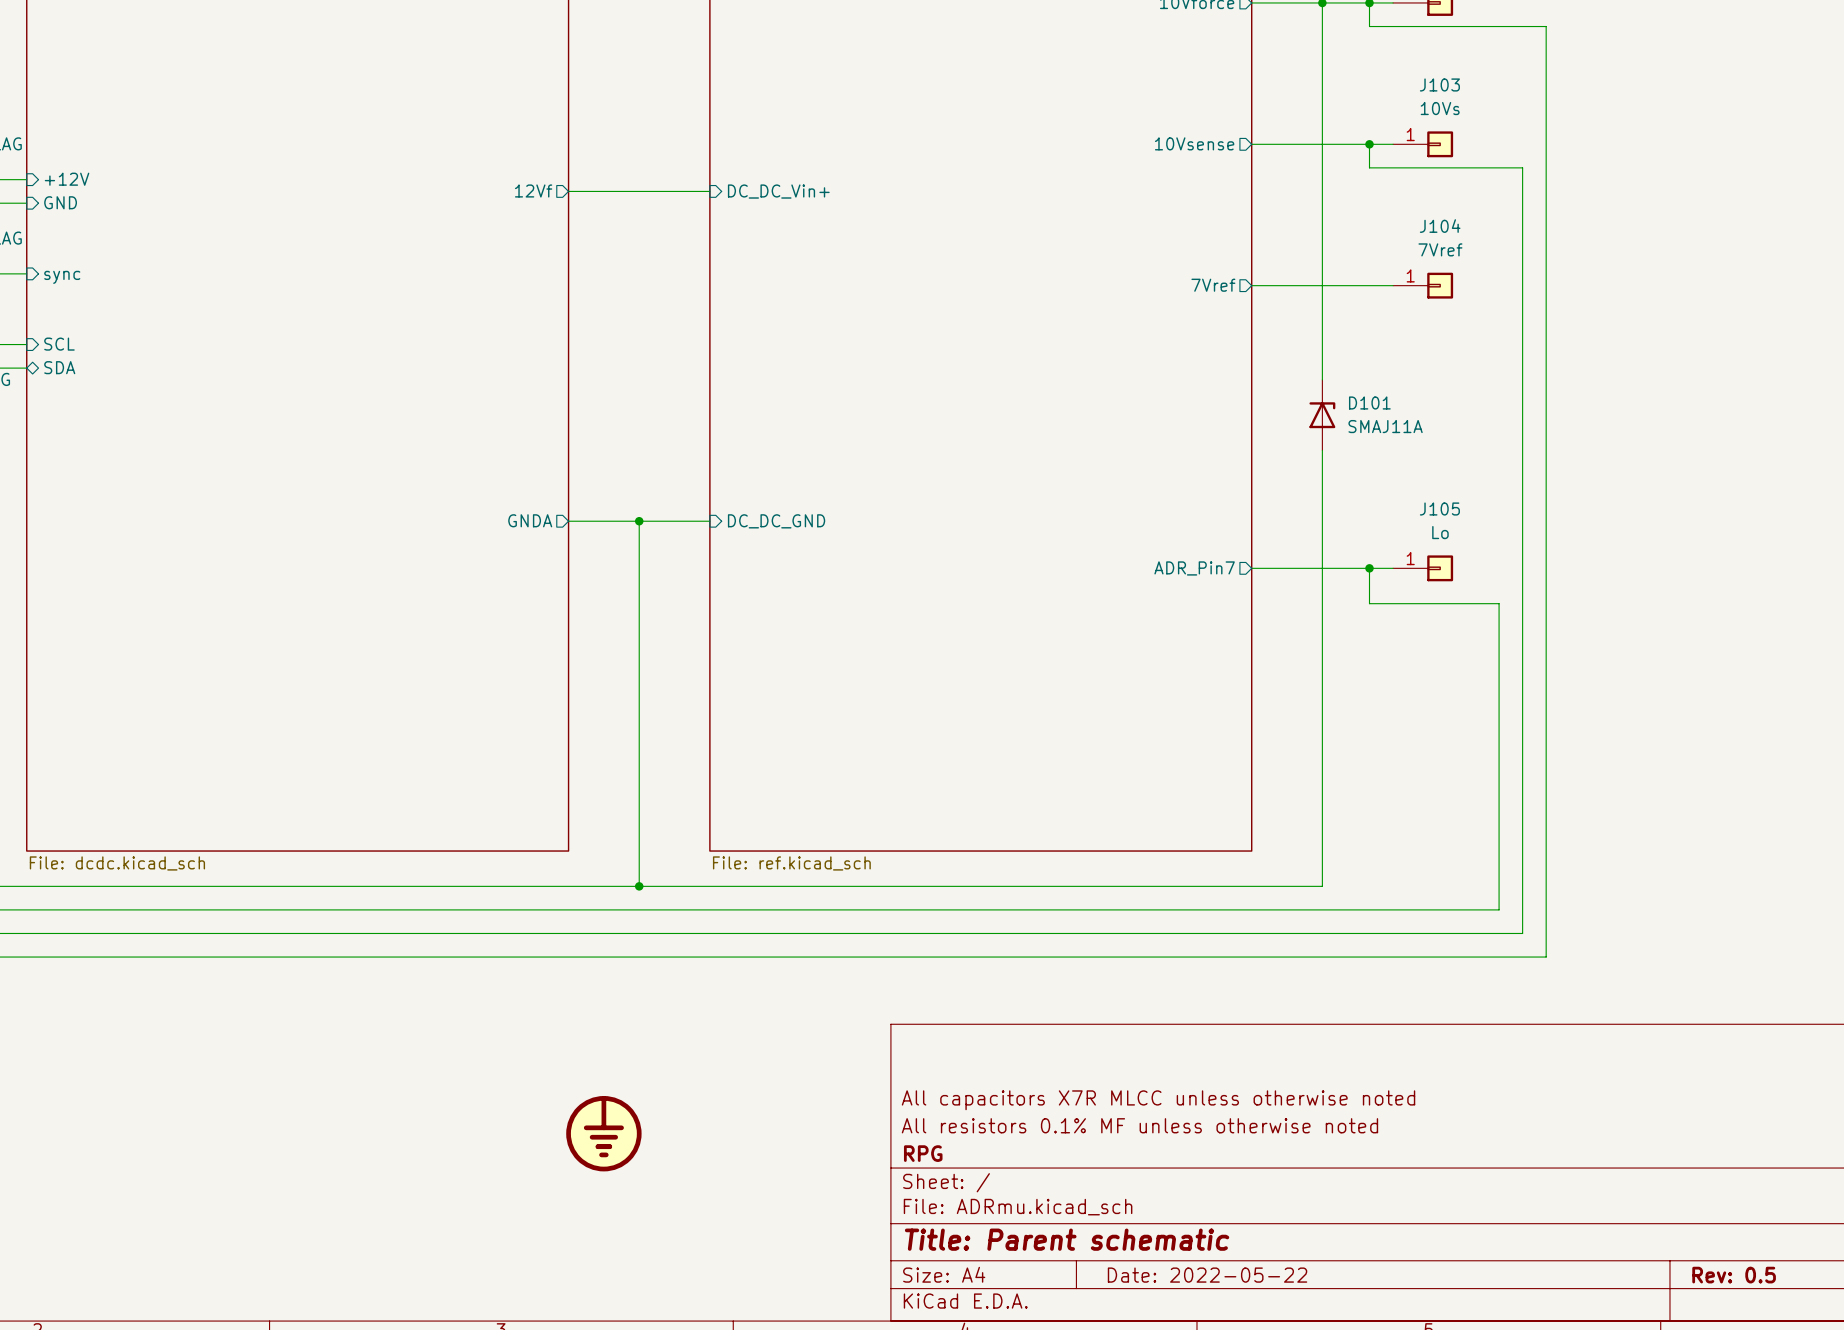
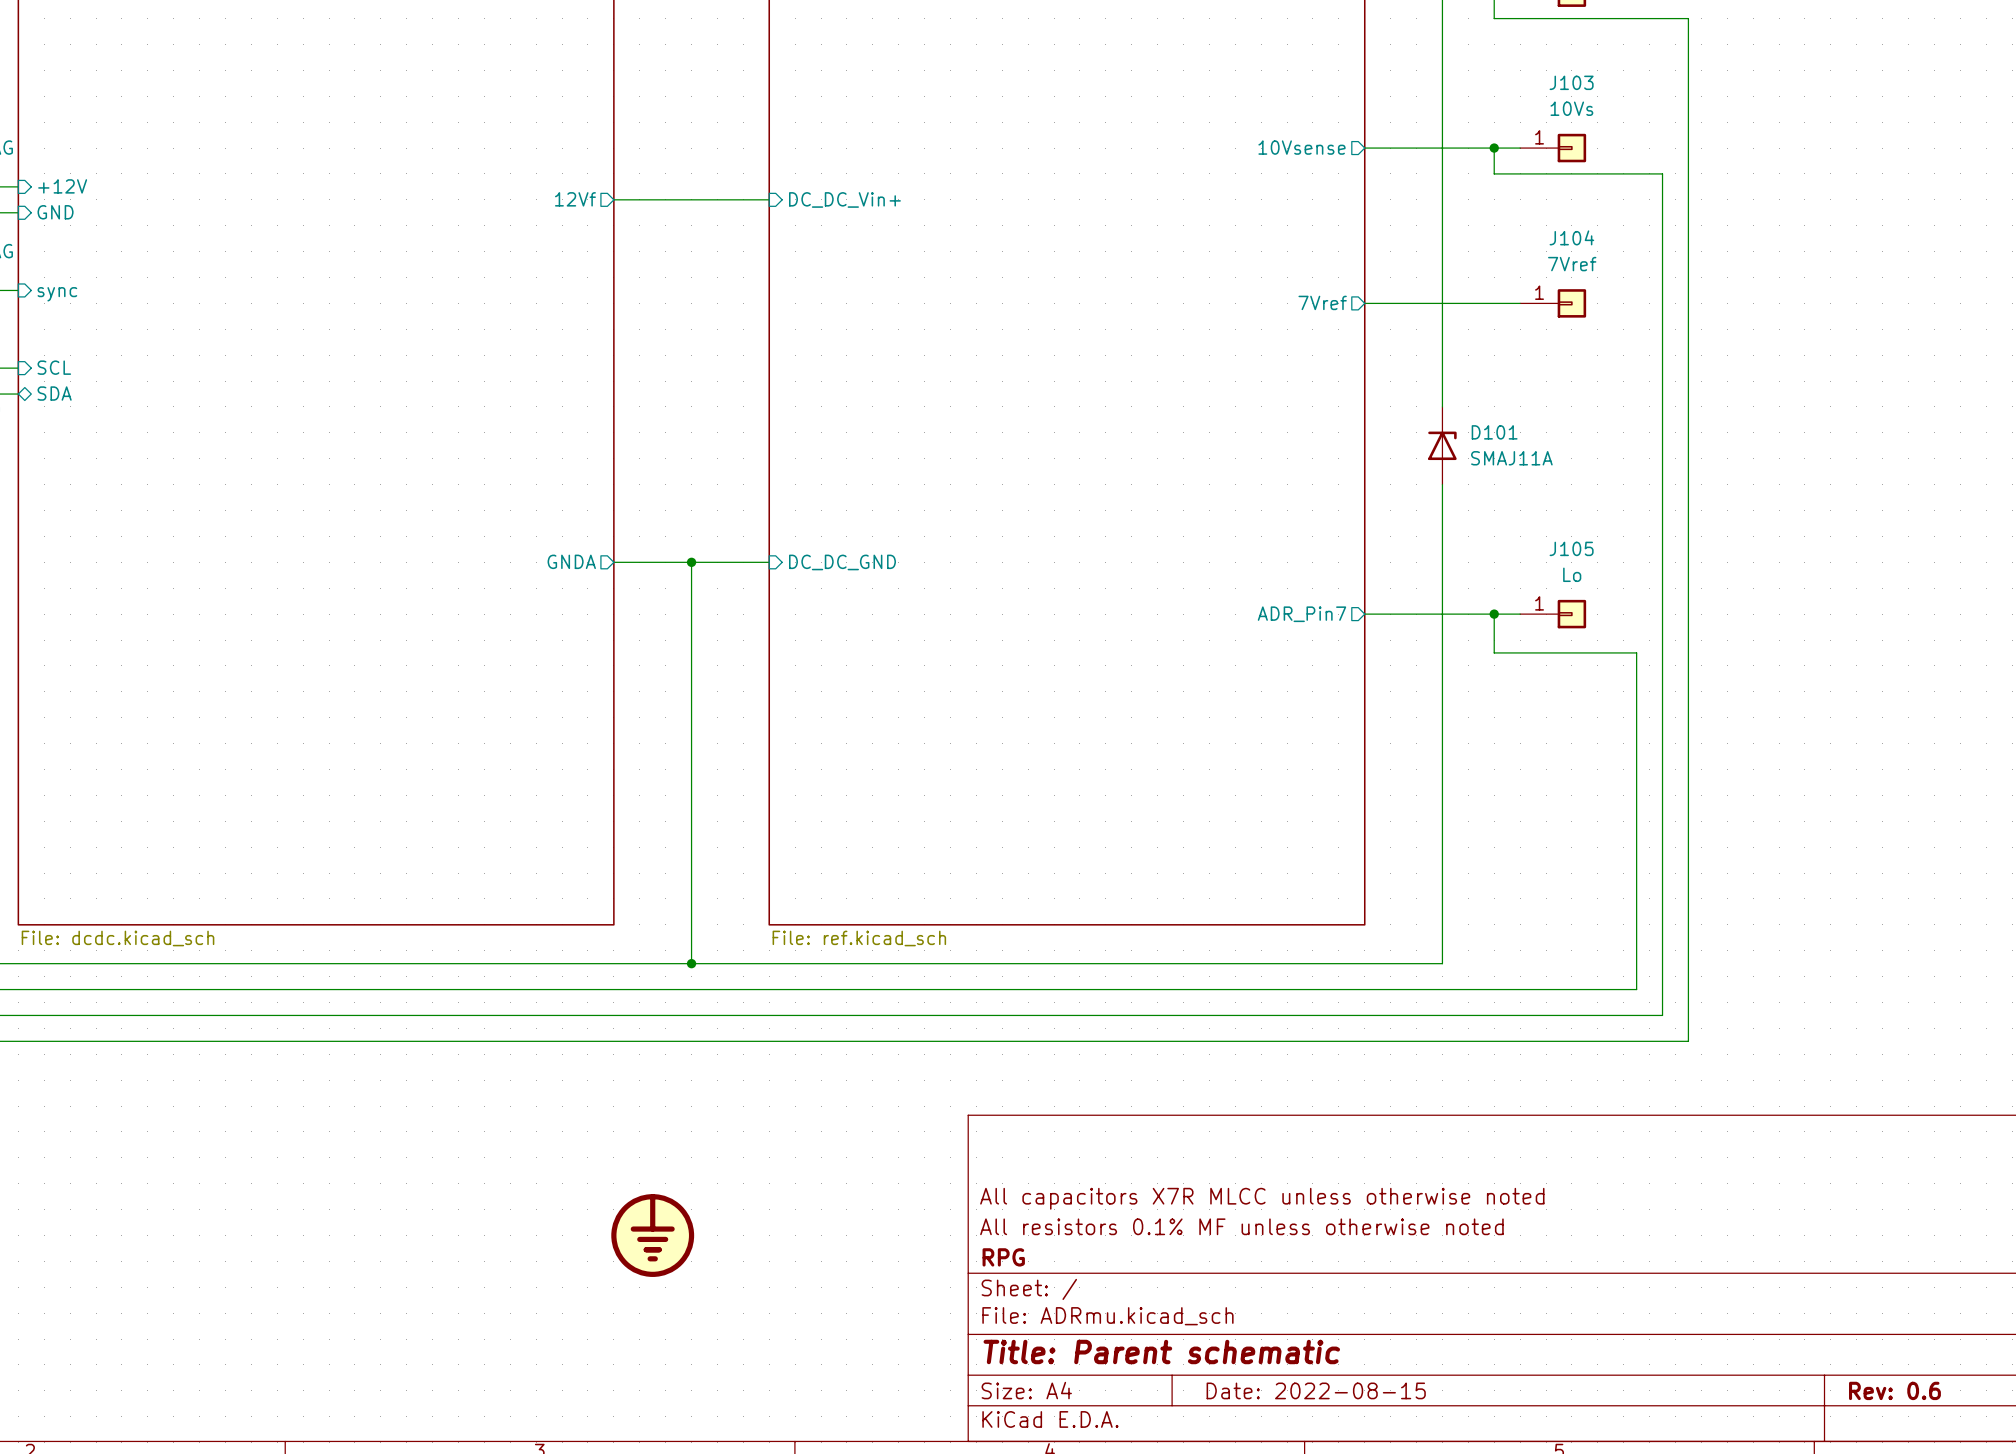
title block: Date: 2022-05-22 (1207, 1275) -> Date: 2022-08-15 (1316, 1390)
title block: Rev: 0.5 (1734, 1275) -> Rev: 0.6 (1894, 1390)

